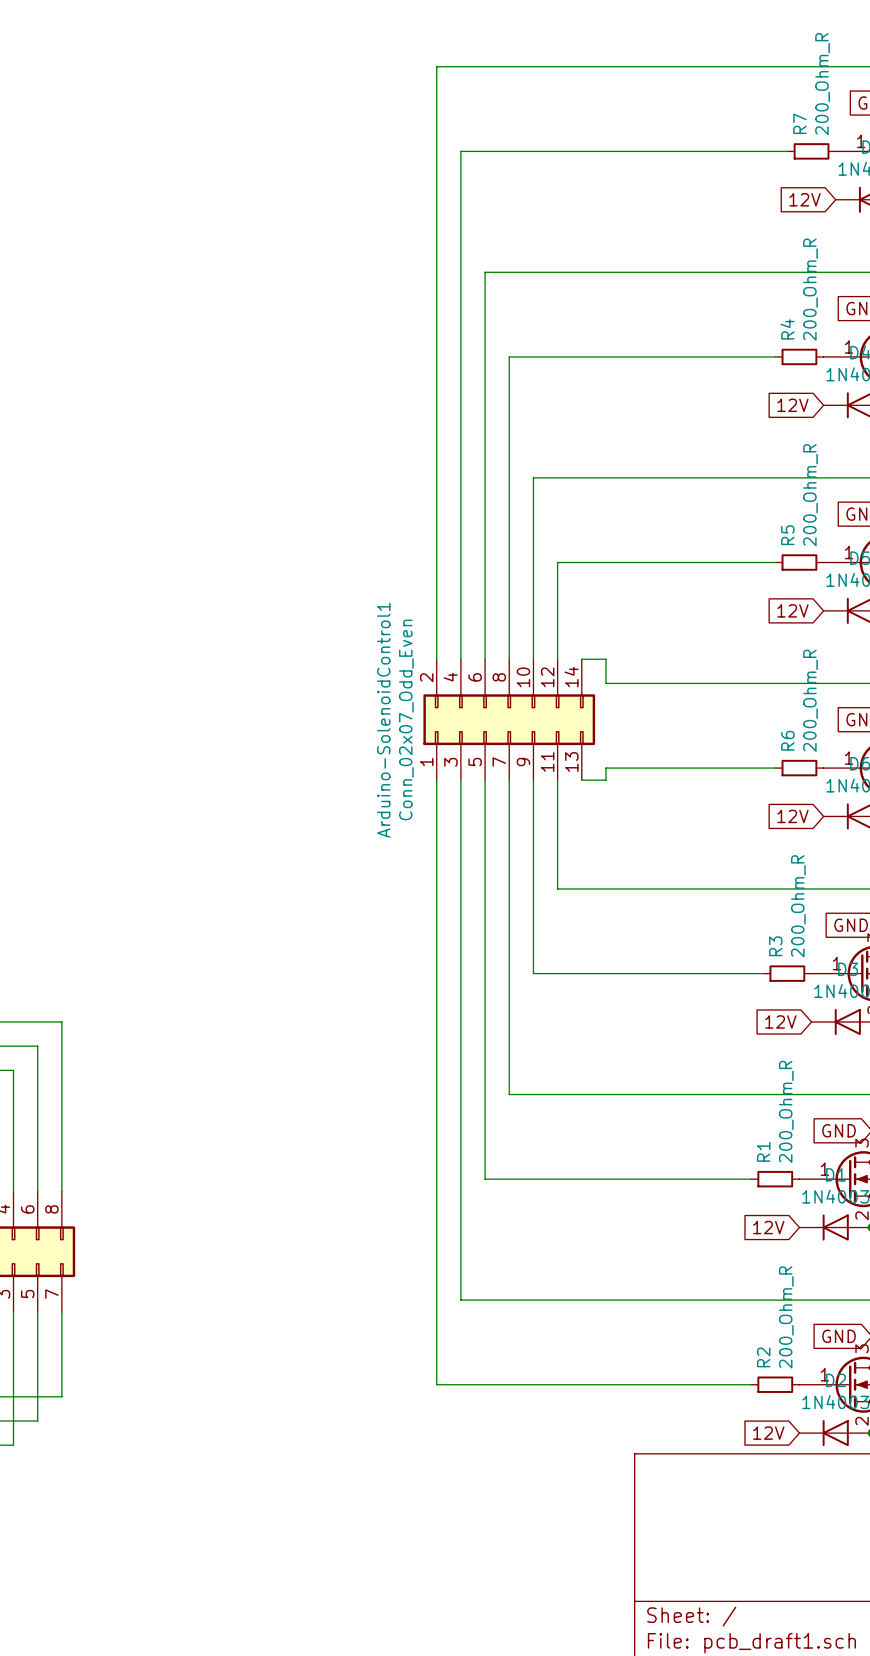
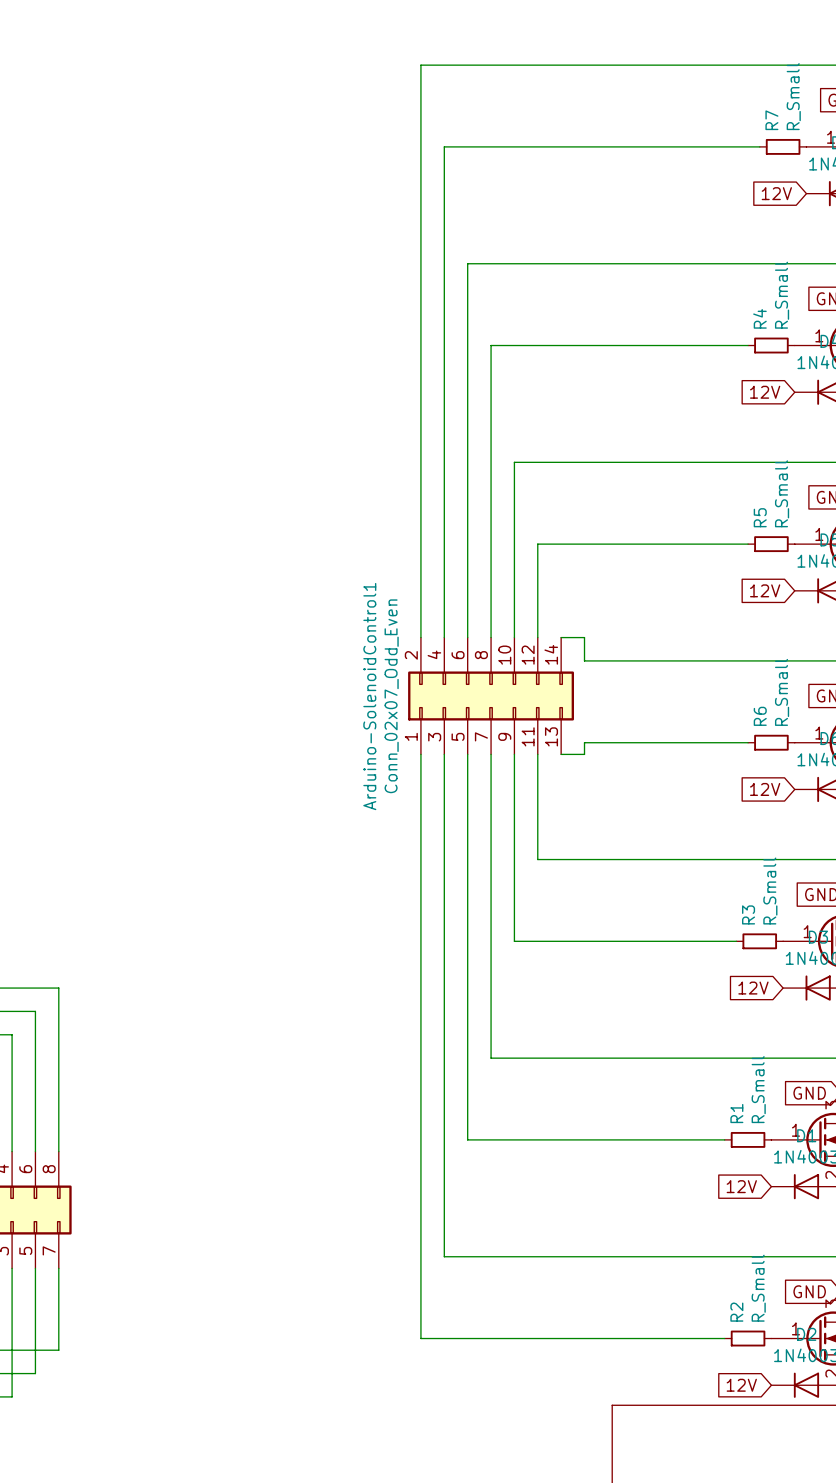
R7 value: 200_Ohm_R (822, 84) -> R_Small (793, 96)
R4 value: 200_Ohm_R (810, 289) -> R_Small (782, 295)
R5 value: 200_Ohm_R (810, 495) -> R_Small (782, 493)
R6 value: 200_Ohm_R (810, 700) -> R_Small (782, 692)
R3 value: 200_Ohm_R (798, 906) -> R_Small (770, 891)
R1 value: 200_Ohm_R (786, 1111) -> R_Small (758, 1089)
R2 value: 200_Ohm_R (786, 1317) -> R_Small (758, 1288)

